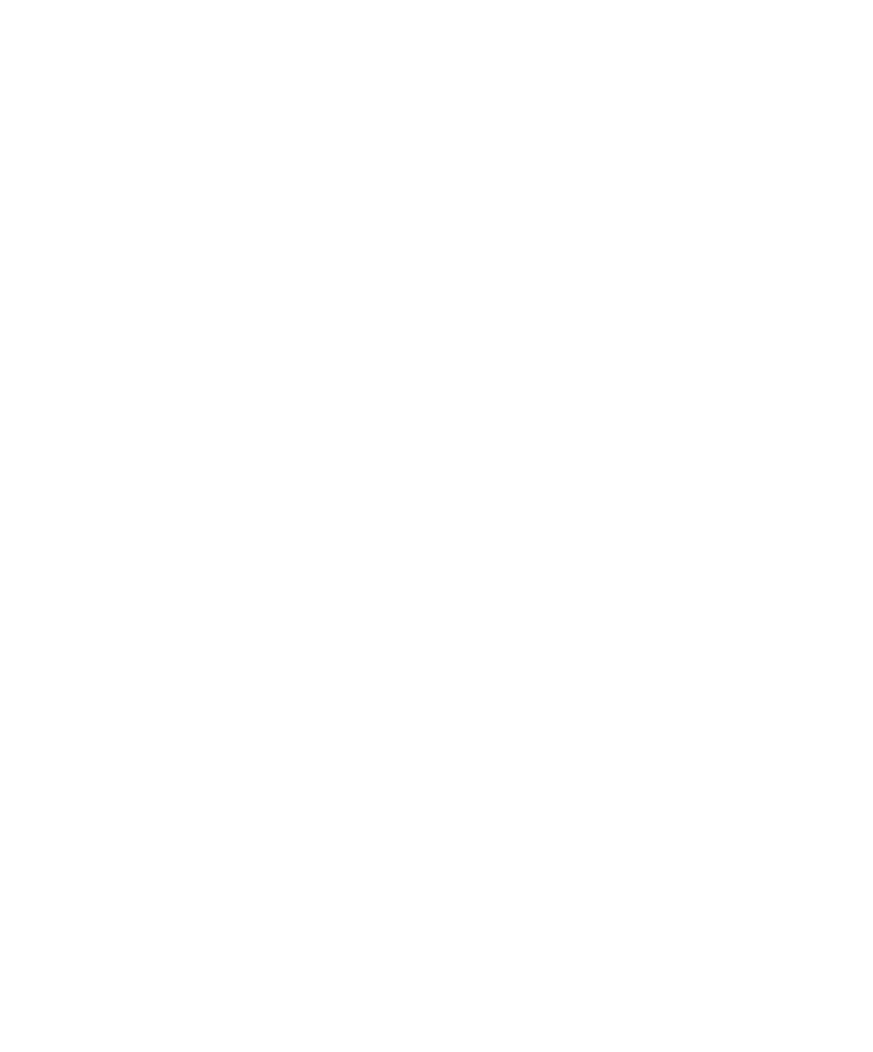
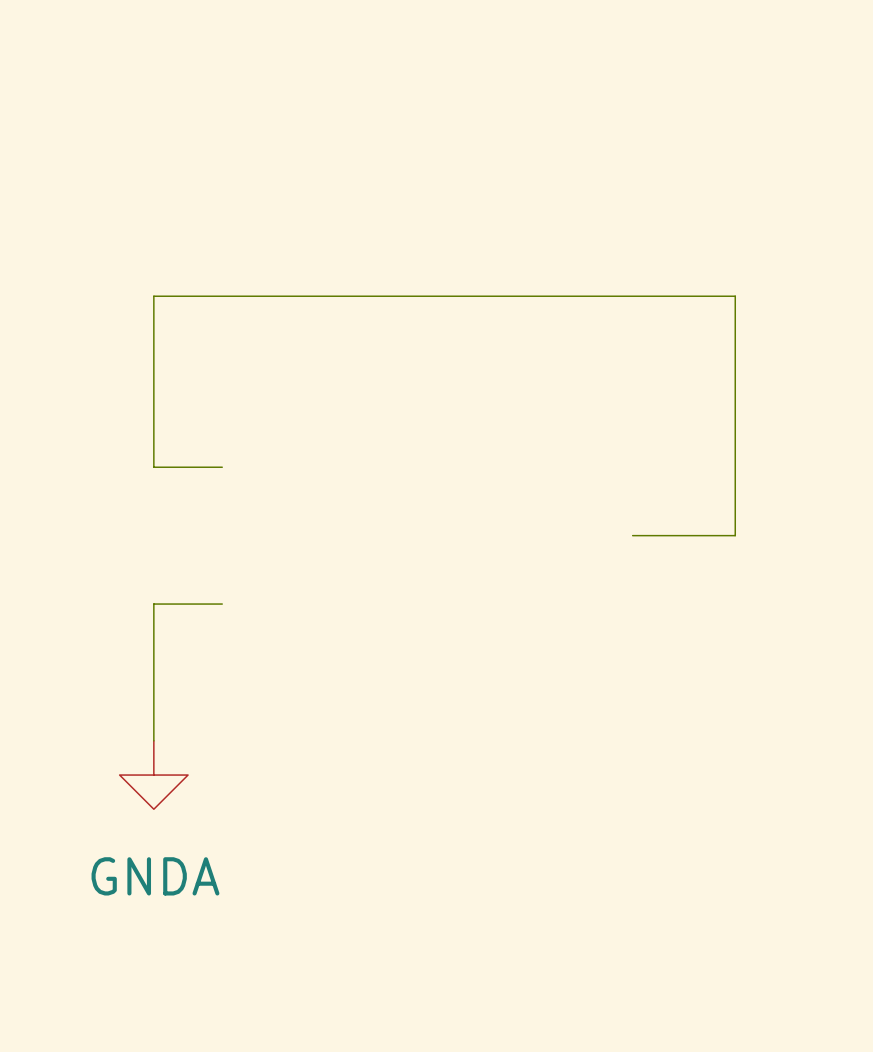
wire: none -> (222, 467) (153, 467) (153, 296) (735, 296) (735, 535) (632, 535)
wire: none -> (222, 604) (153, 604) (153, 740)
power symbol: none -> GNDA (153, 775)

